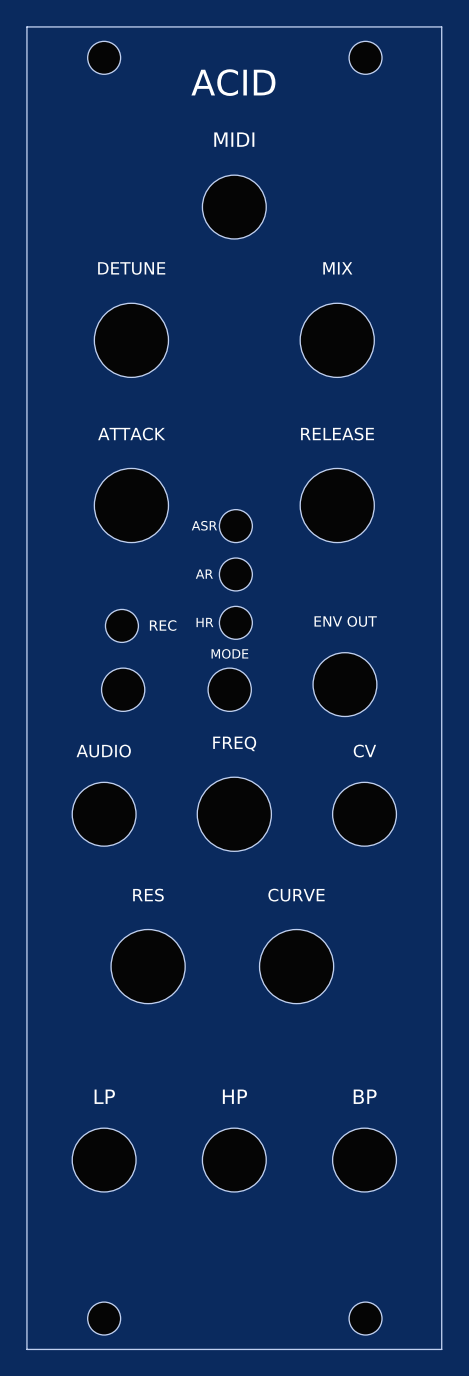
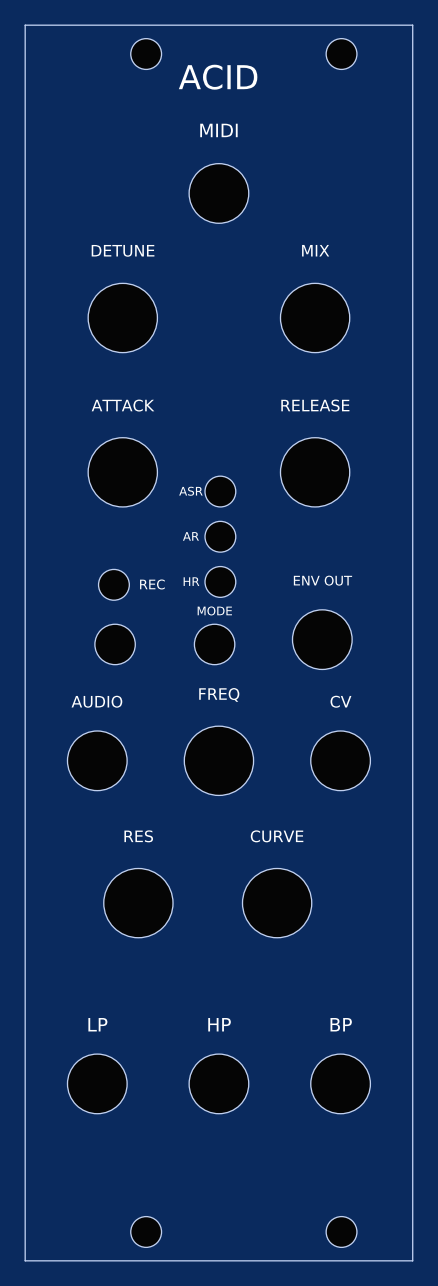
part position: (104, 57) -> (146, 54)
part position: (104, 1318) -> (146, 1231)

